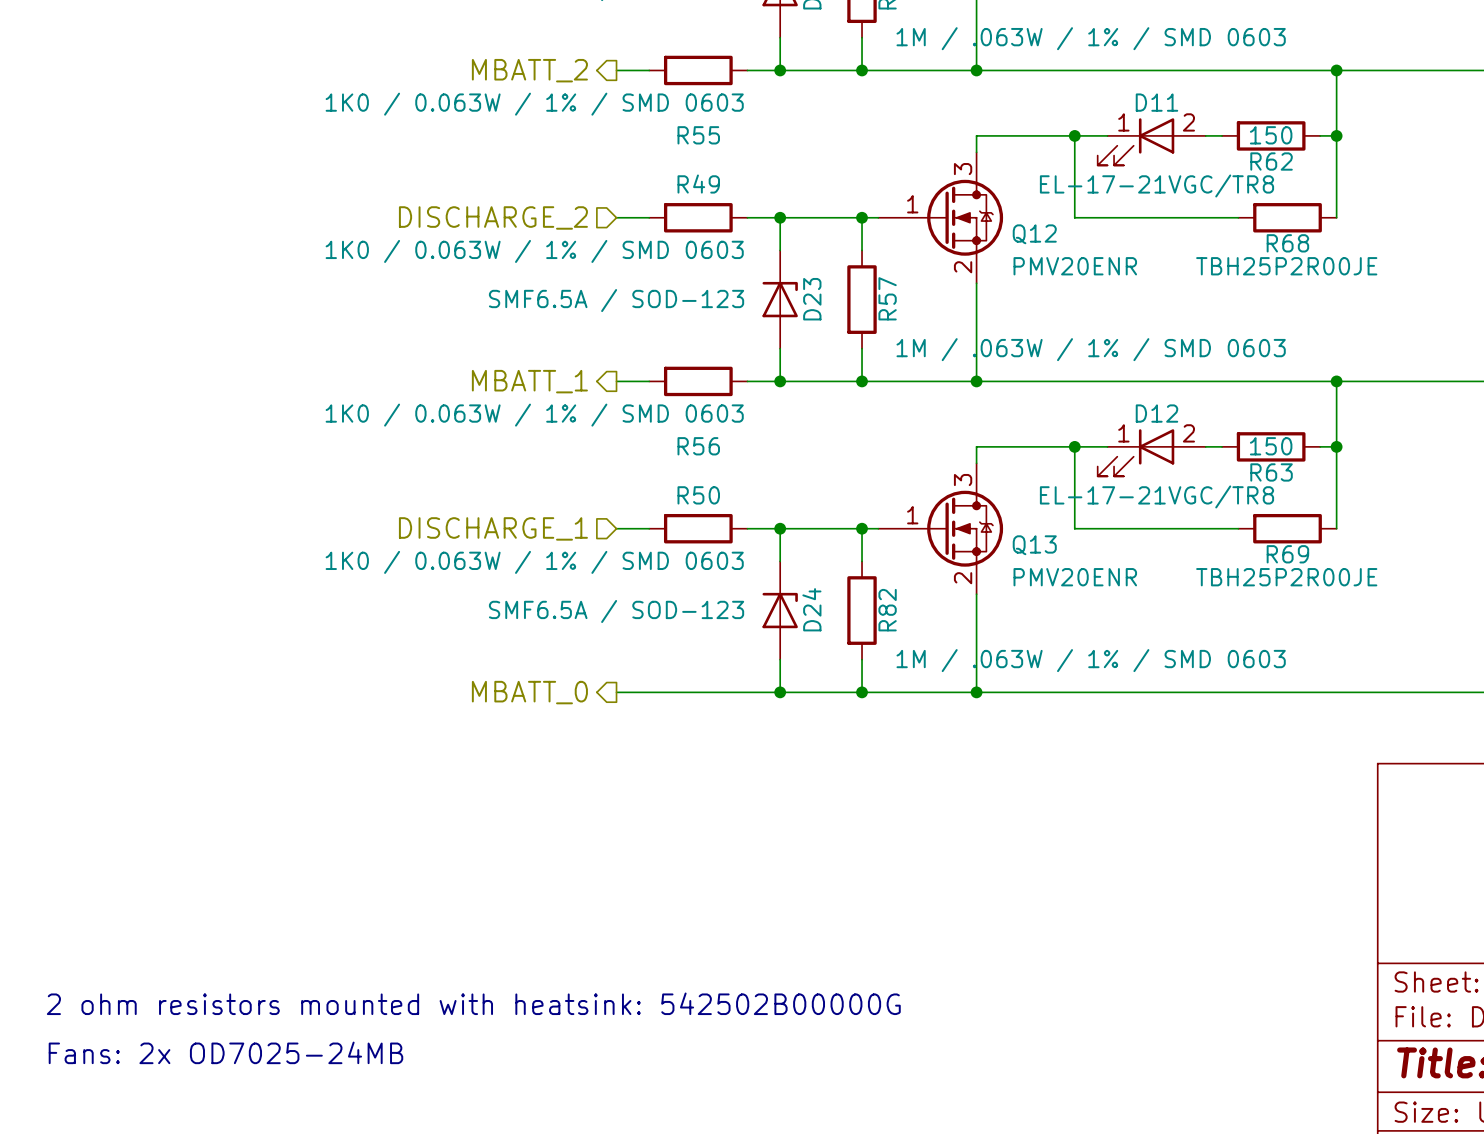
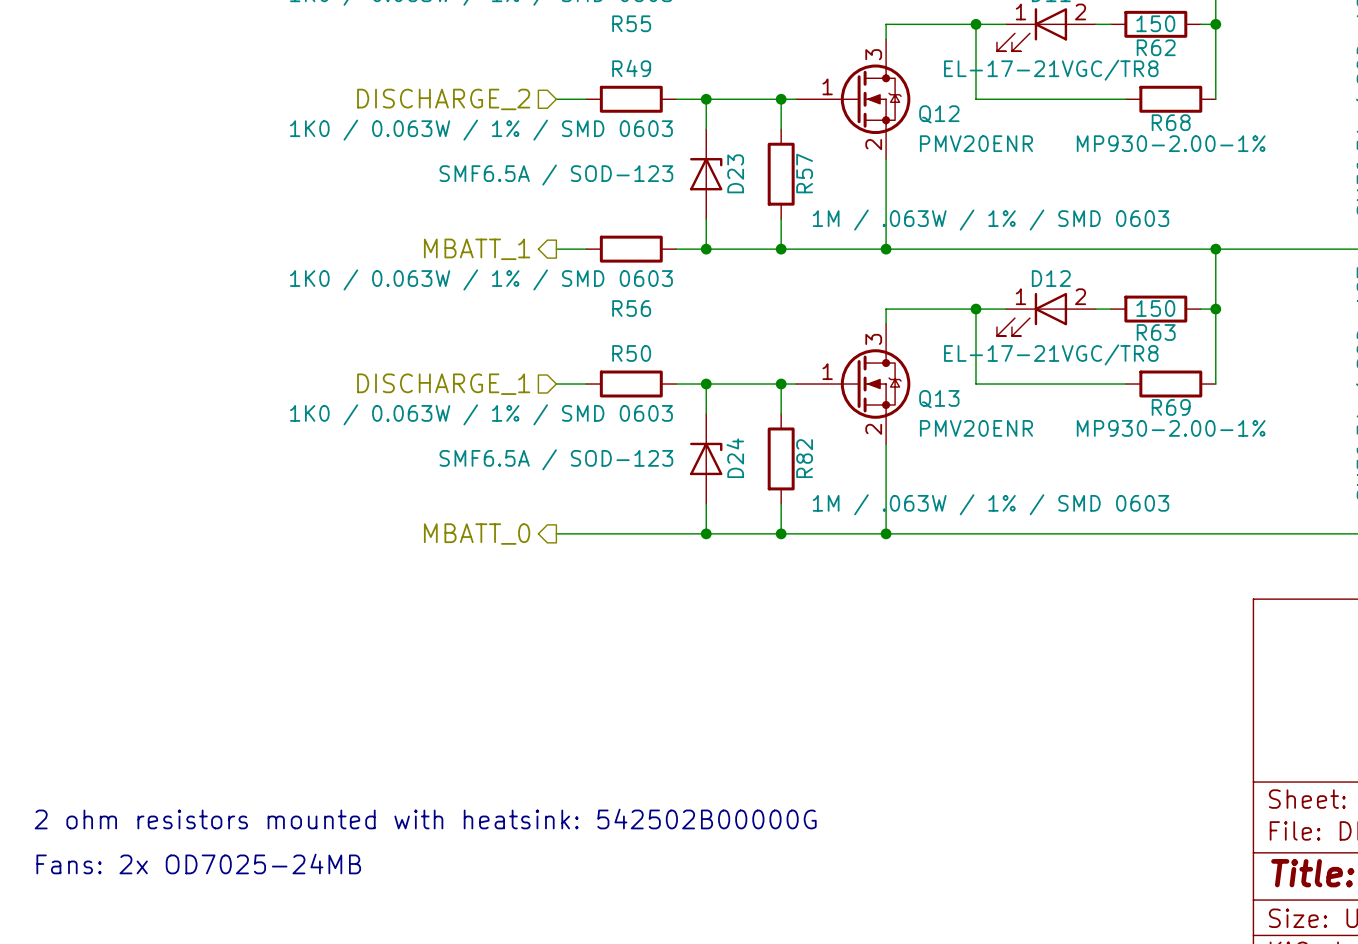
R68 value: TBH25P2R00JE (1286, 266) -> MP930-2.00-1% (1171, 143)
R69 value: TBH25P2R00JE (1286, 577) -> MP930-2.00-1% (1171, 428)

